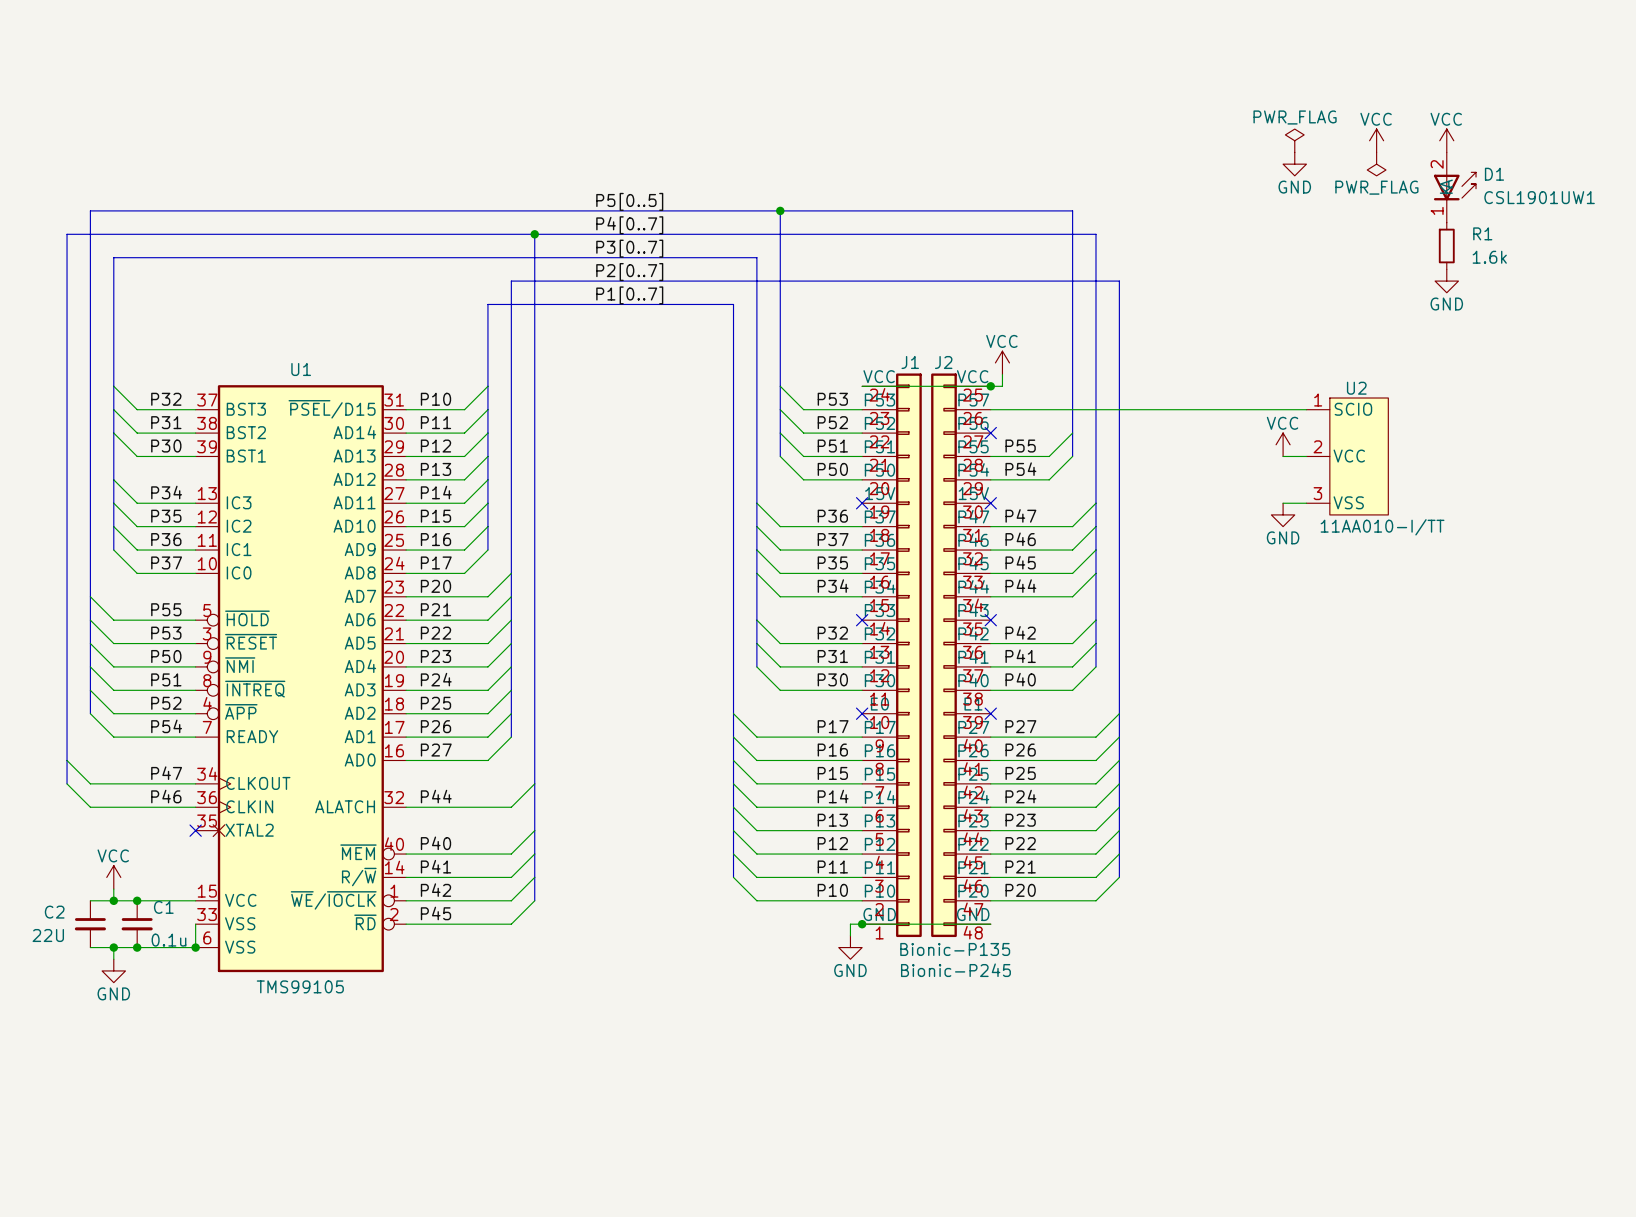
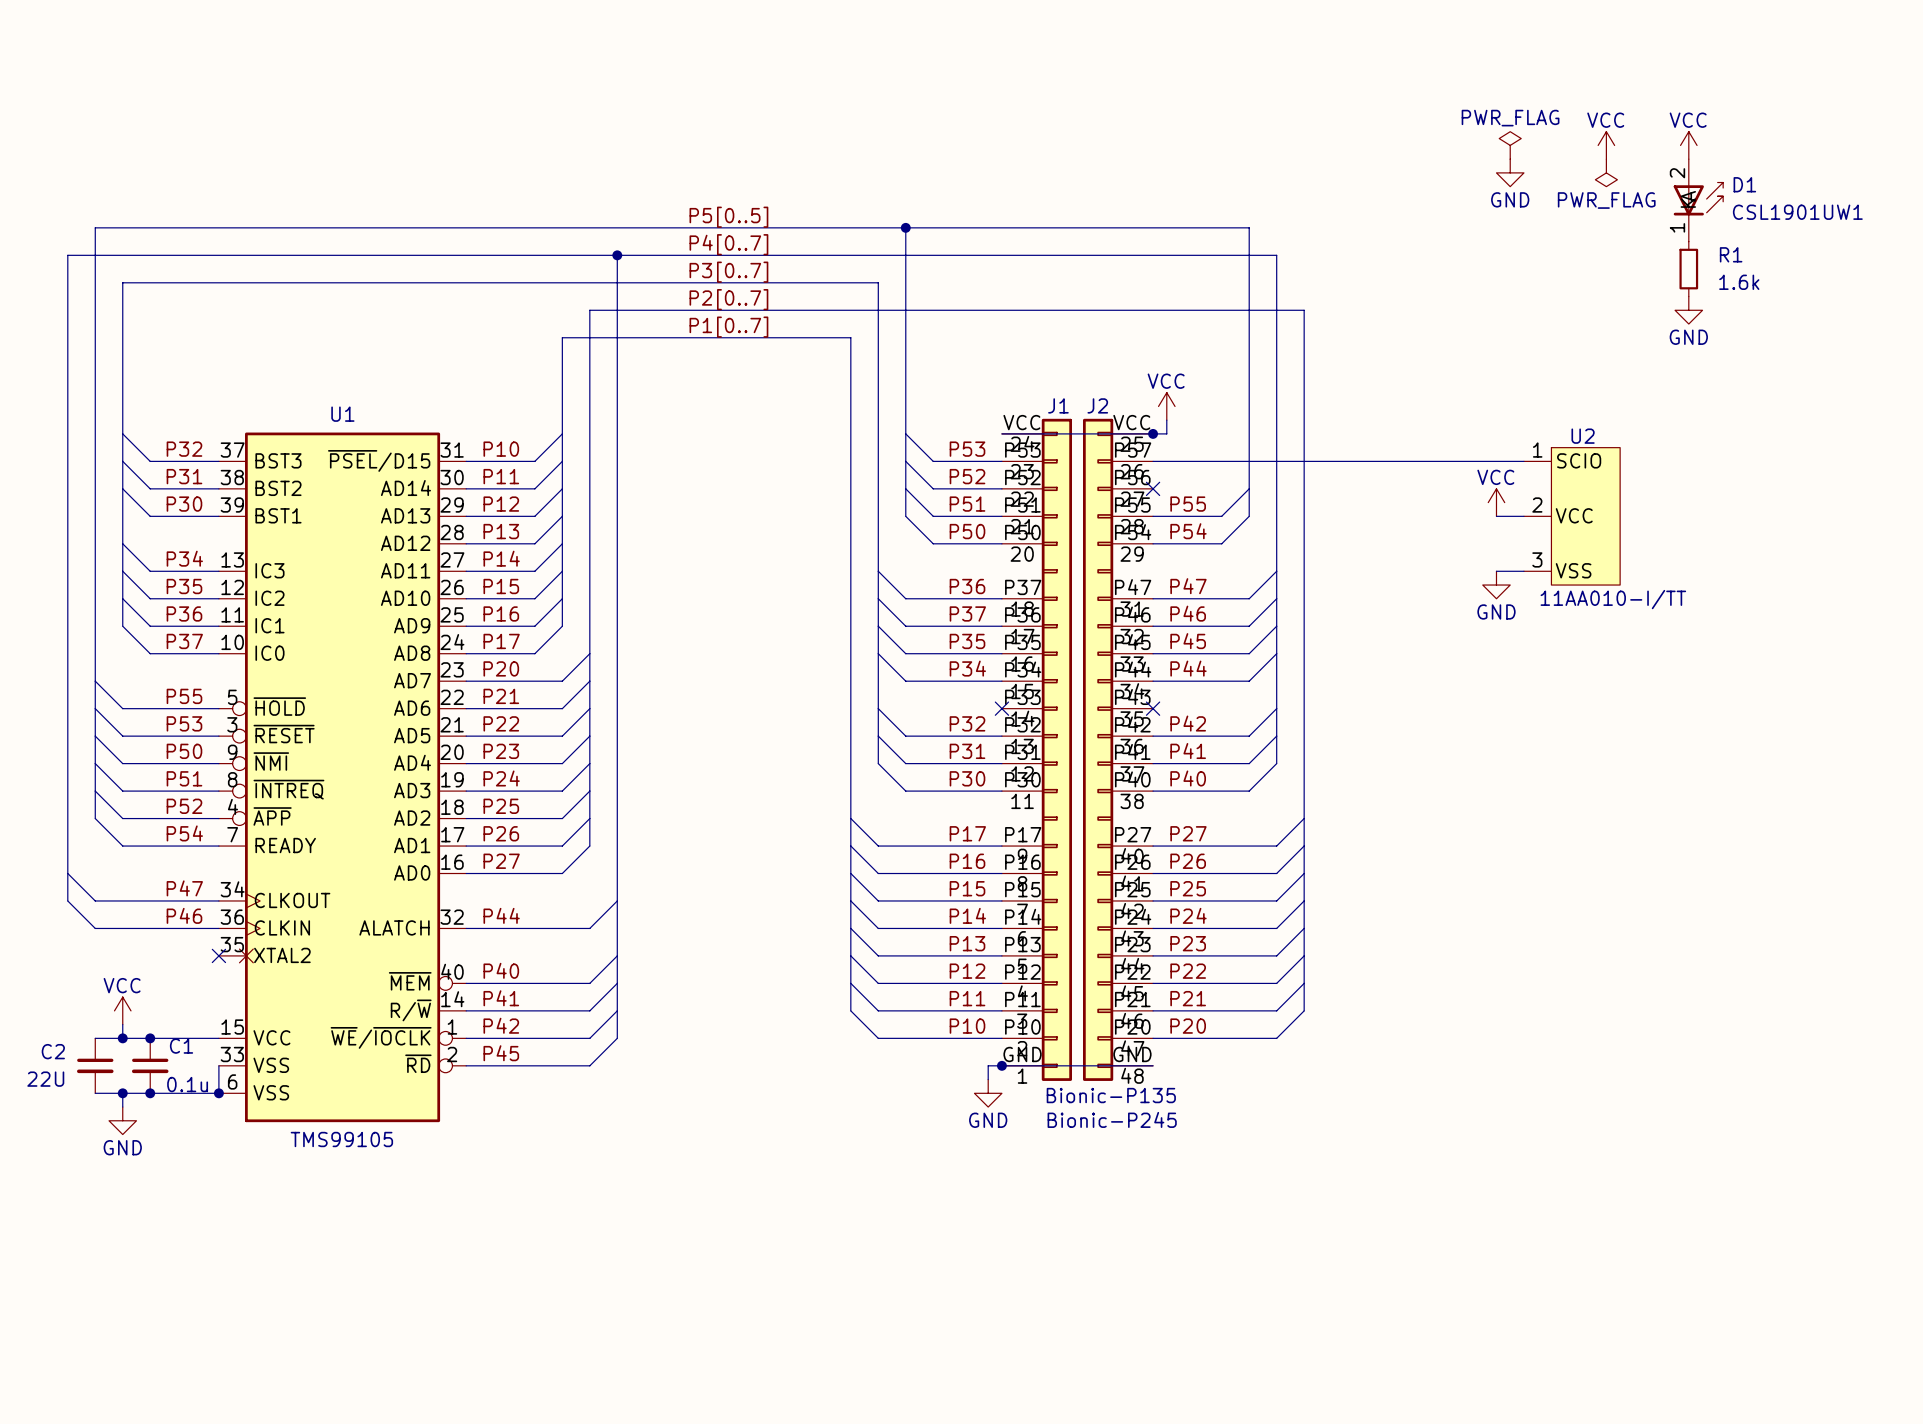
J1 symbol: [862, 373, 922, 938] -> [1001, 418, 1073, 1081]
J2 symbol: [931, 373, 991, 938] -> [1082, 418, 1154, 1081]
no-connect mark: (862, 503) -> none
no-connect mark: (990, 503) -> none
no-connect mark: (862, 713) -> none
no-connect mark: (990, 713) -> none

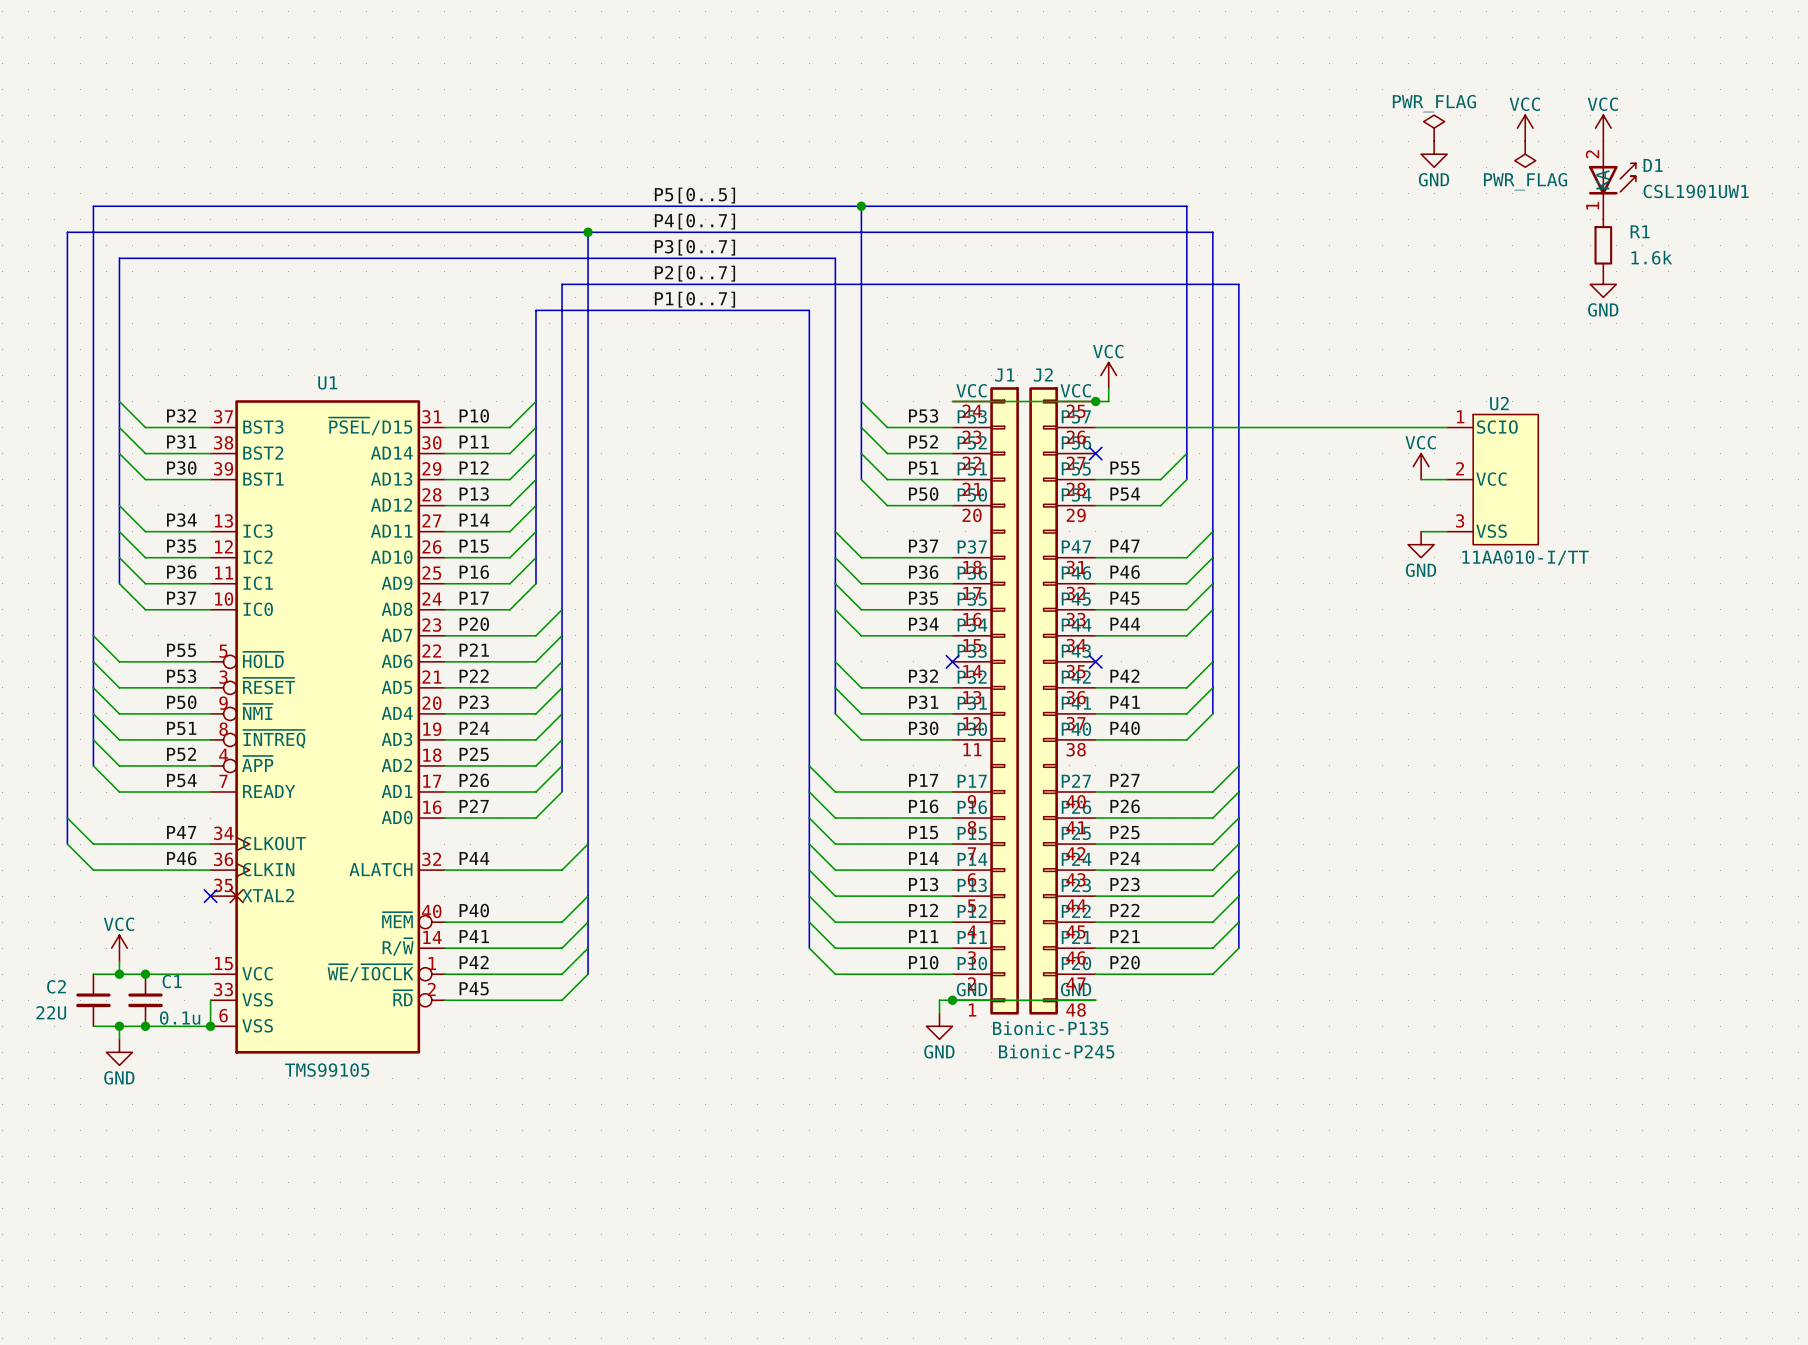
label: P36 (967, 586) -> P37 (923, 546)
label: P37 (967, 613) -> P36 (923, 572)

